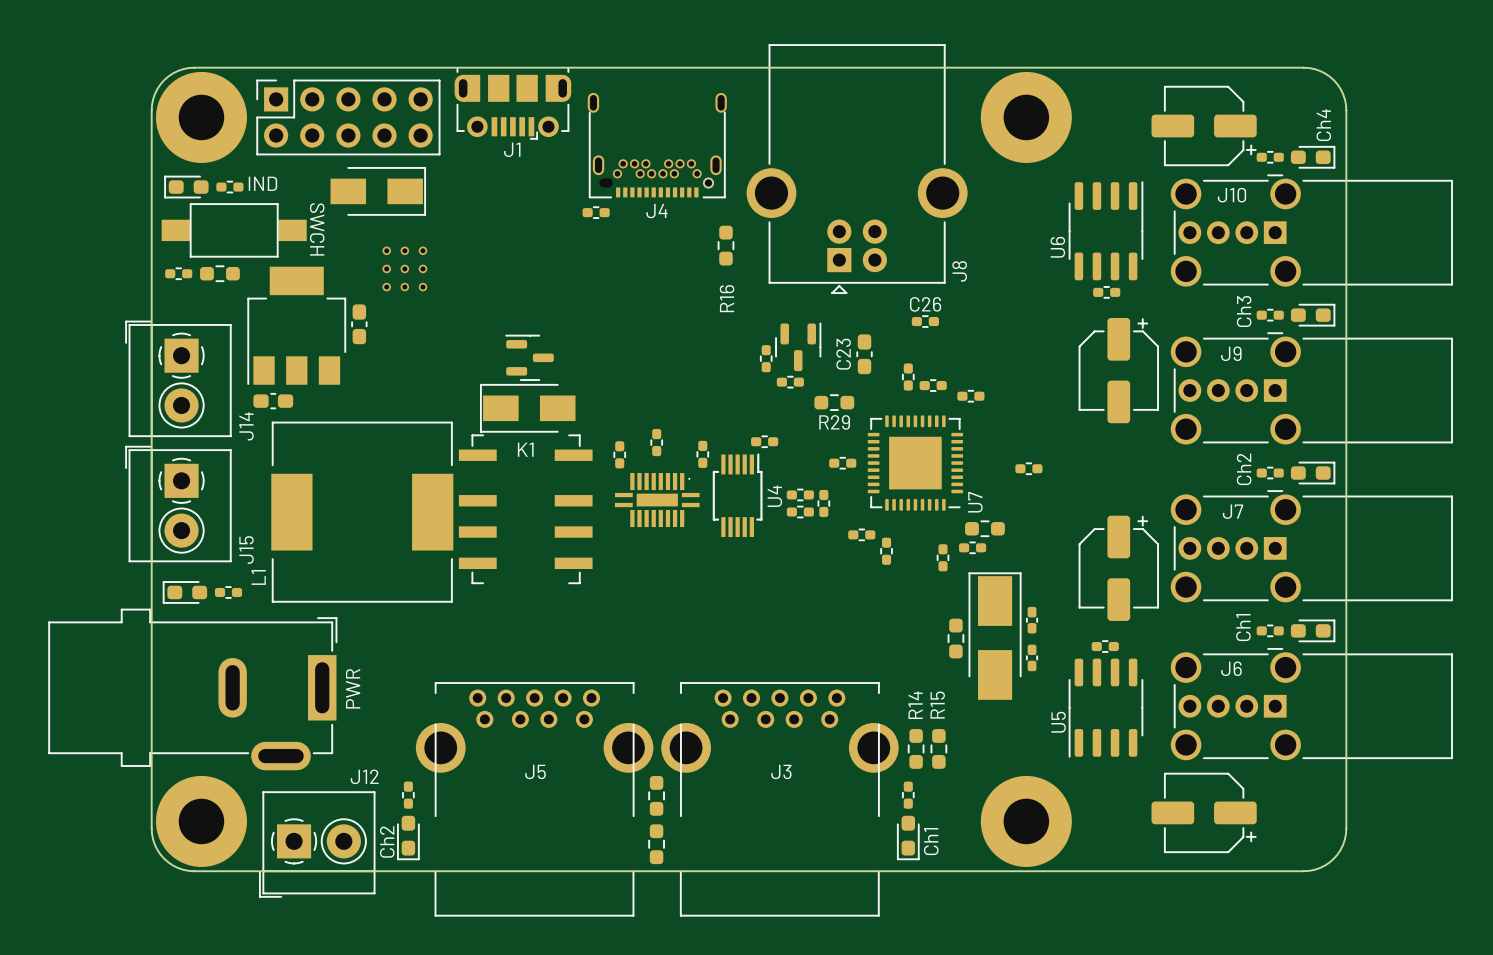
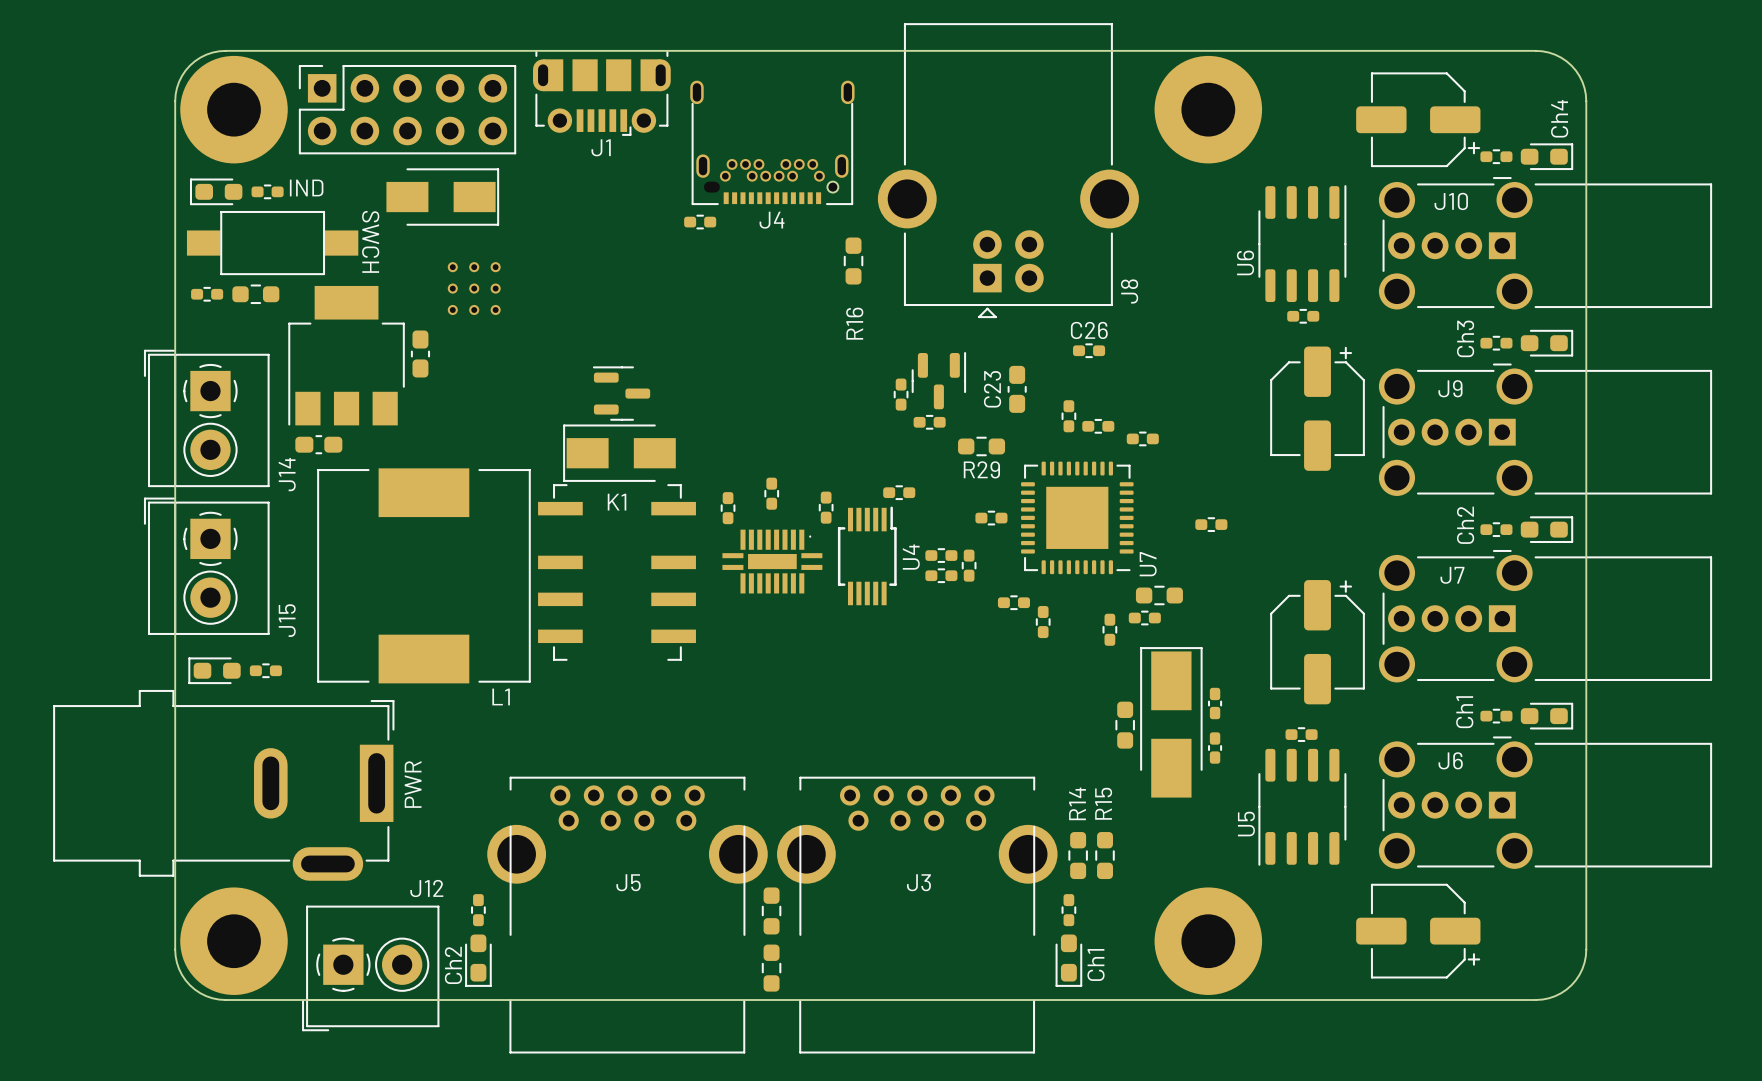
L1 rotation: 0° (362, 512) -> 90° clockwise (423, 575)
L1 name position: L1 (258, 577) -> L1 (501, 697)

